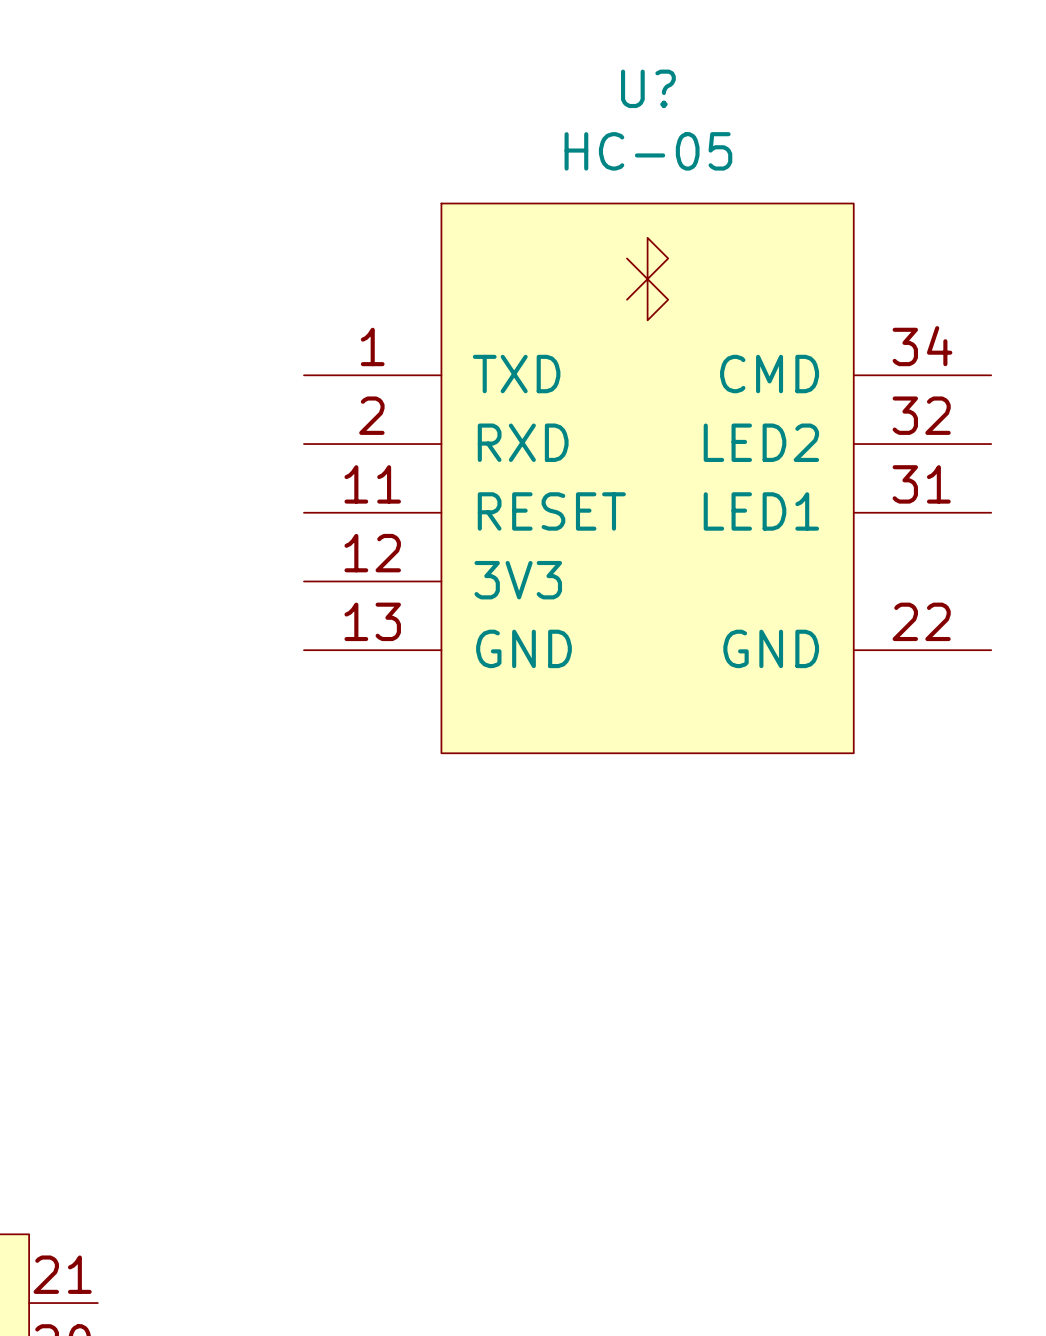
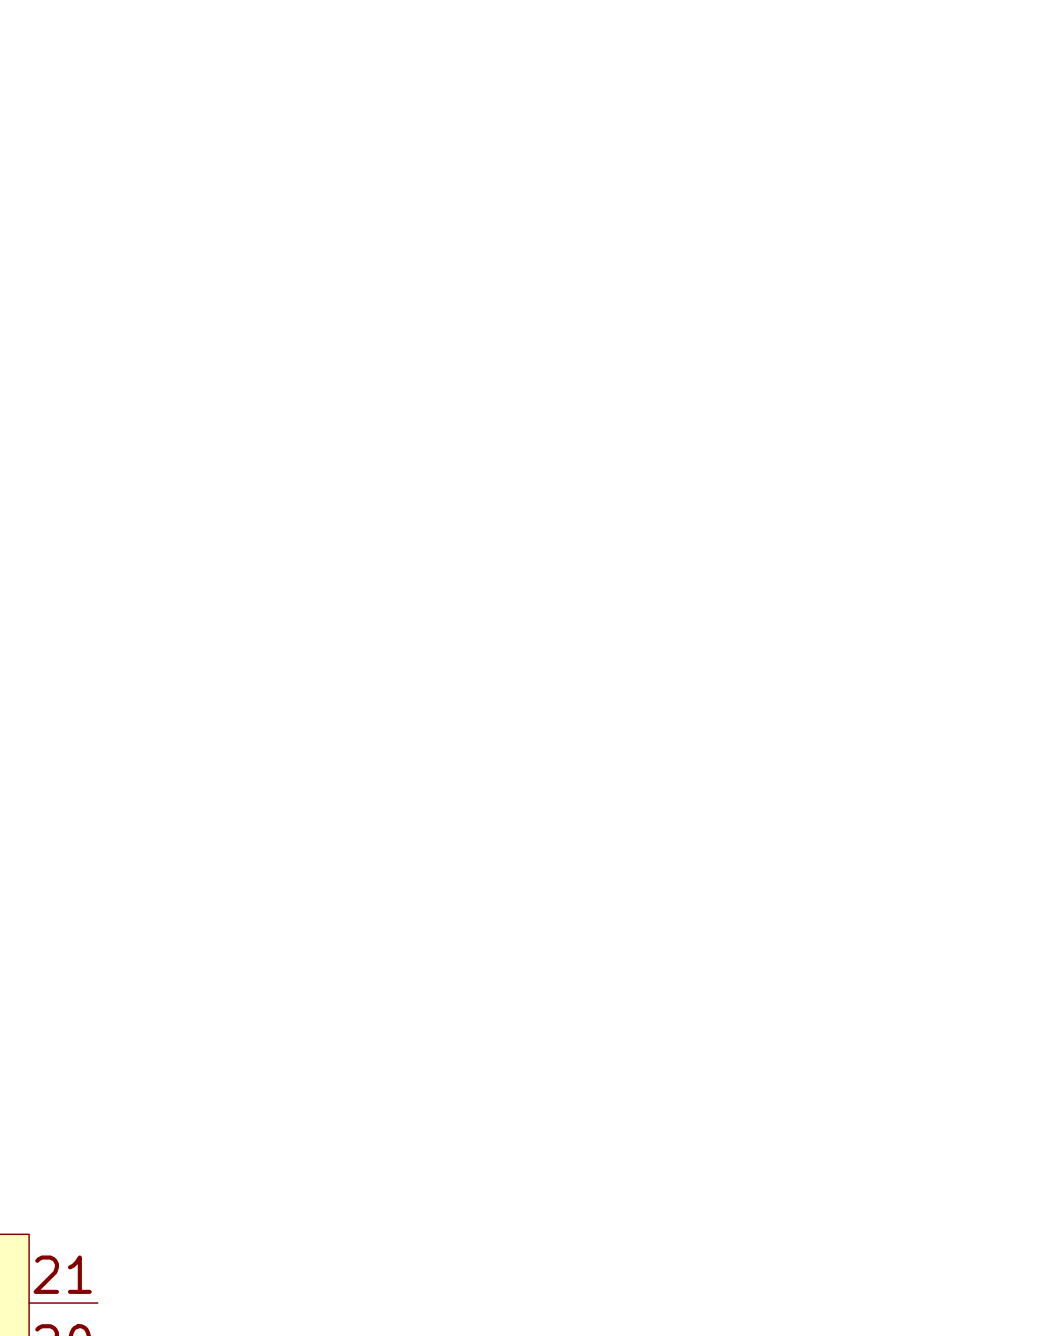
U?: HC-05 (647, 478) -> none

